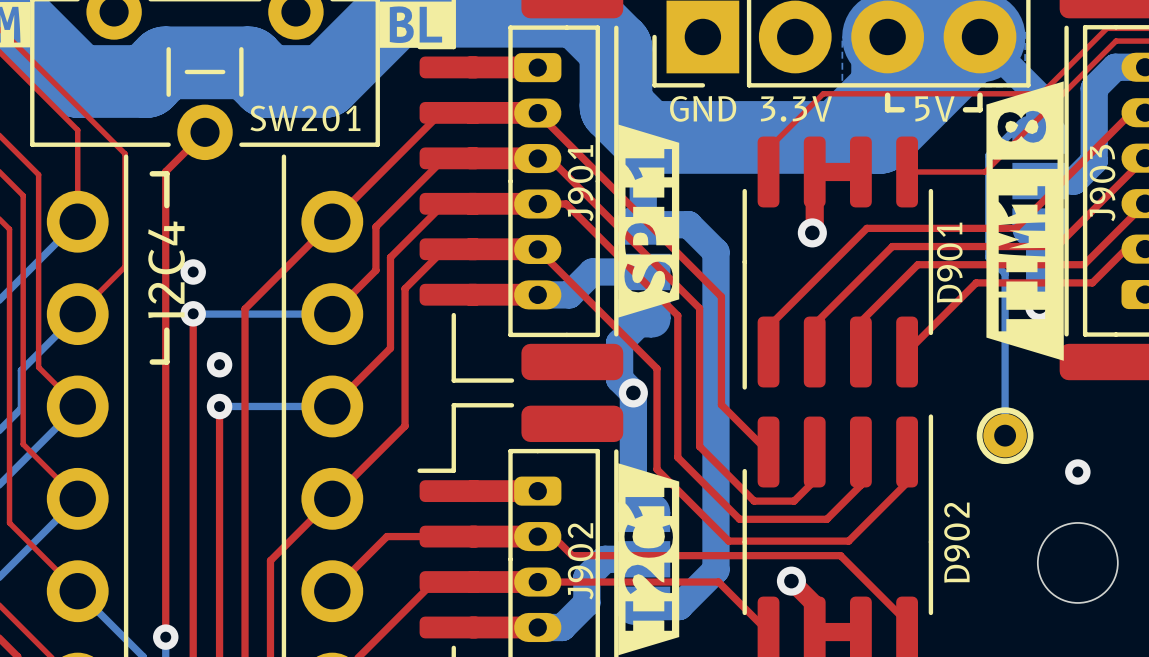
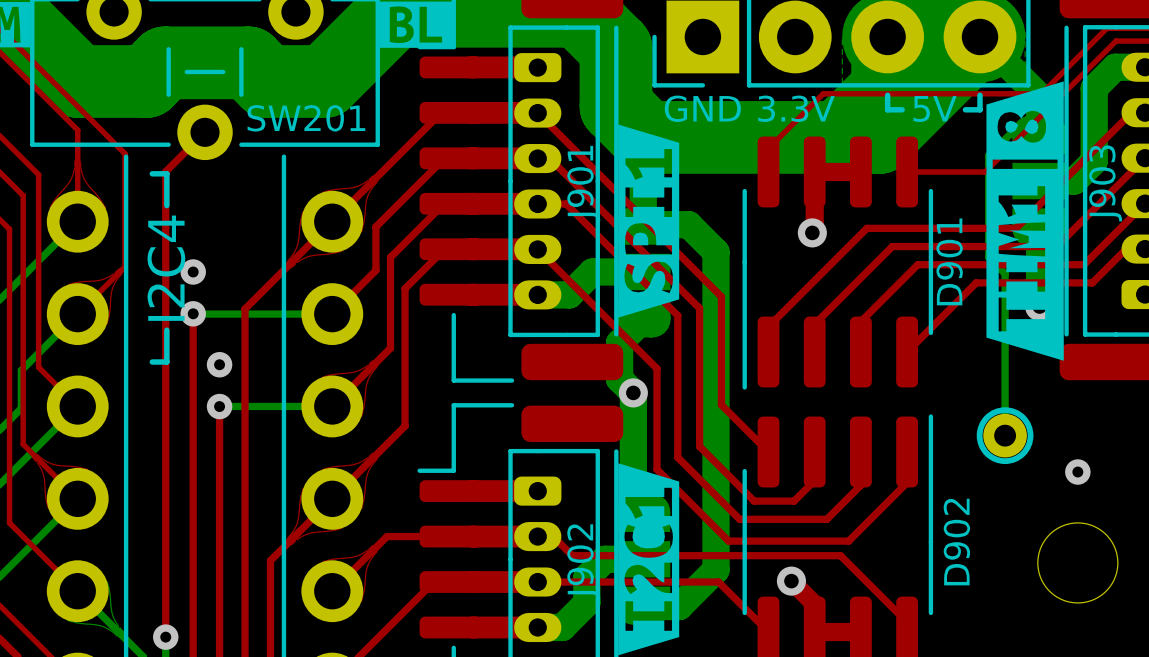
top zone outline: none -> (75, 160) (71, 178) (49, 208) (77, 237) (105, 208) (83, 178) (80, 160) (75, 160)
top zone outline: none -> (373, 175) (358, 186) (322, 192) (321, 232) (361, 231) (367, 195) (378, 180) (373, 175)
top zone outline: none -> (343, 210) (342, 250) (306, 257) (291, 267) (286, 262) (296, 247) (303, 211) (343, 210)
top zone outline: none -> (119, 268) (103, 279) (67, 284) (66, 325) (106, 324) (112, 287) (123, 272) (119, 268)
top zone outline: none -> (373, 360) (358, 370) (322, 377) (321, 417) (361, 416) (367, 380) (378, 365) (373, 360)
top zone outline: none -> (373, 452) (358, 463) (322, 469) (321, 509) (361, 508) (367, 473) (378, 457) (373, 452)
top zone outline: none -> (36, 453) (51, 463) (87, 469) (88, 509) (48, 508) (42, 472) (32, 457) (36, 453)
top zone outline: none -> (343, 487) (342, 528) (306, 534) (291, 544) (286, 539) (296, 524) (303, 488) (343, 487)
top zone outline: none -> (373, 545) (358, 555) (322, 562) (321, 602) (361, 601) (367, 565) (378, 550) (373, 545)
bottom zone outline: none -> (66, 580) (106, 581) (113, 616) (123, 632) (118, 637) (103, 626) (67, 620) (66, 580)

